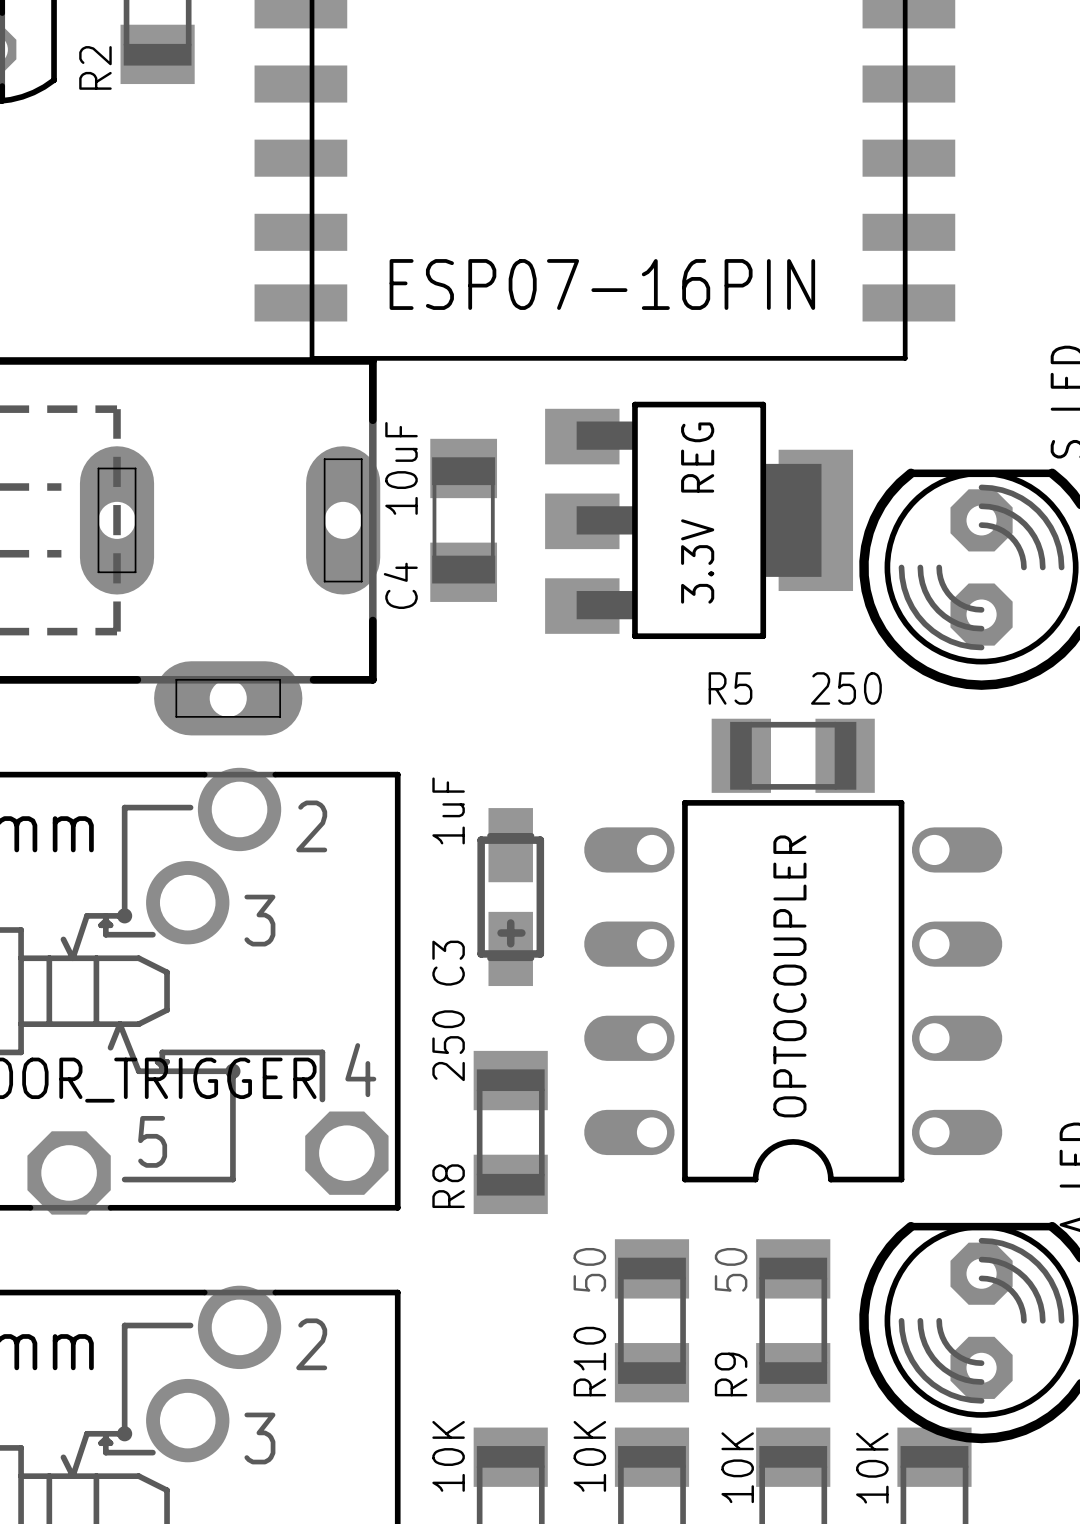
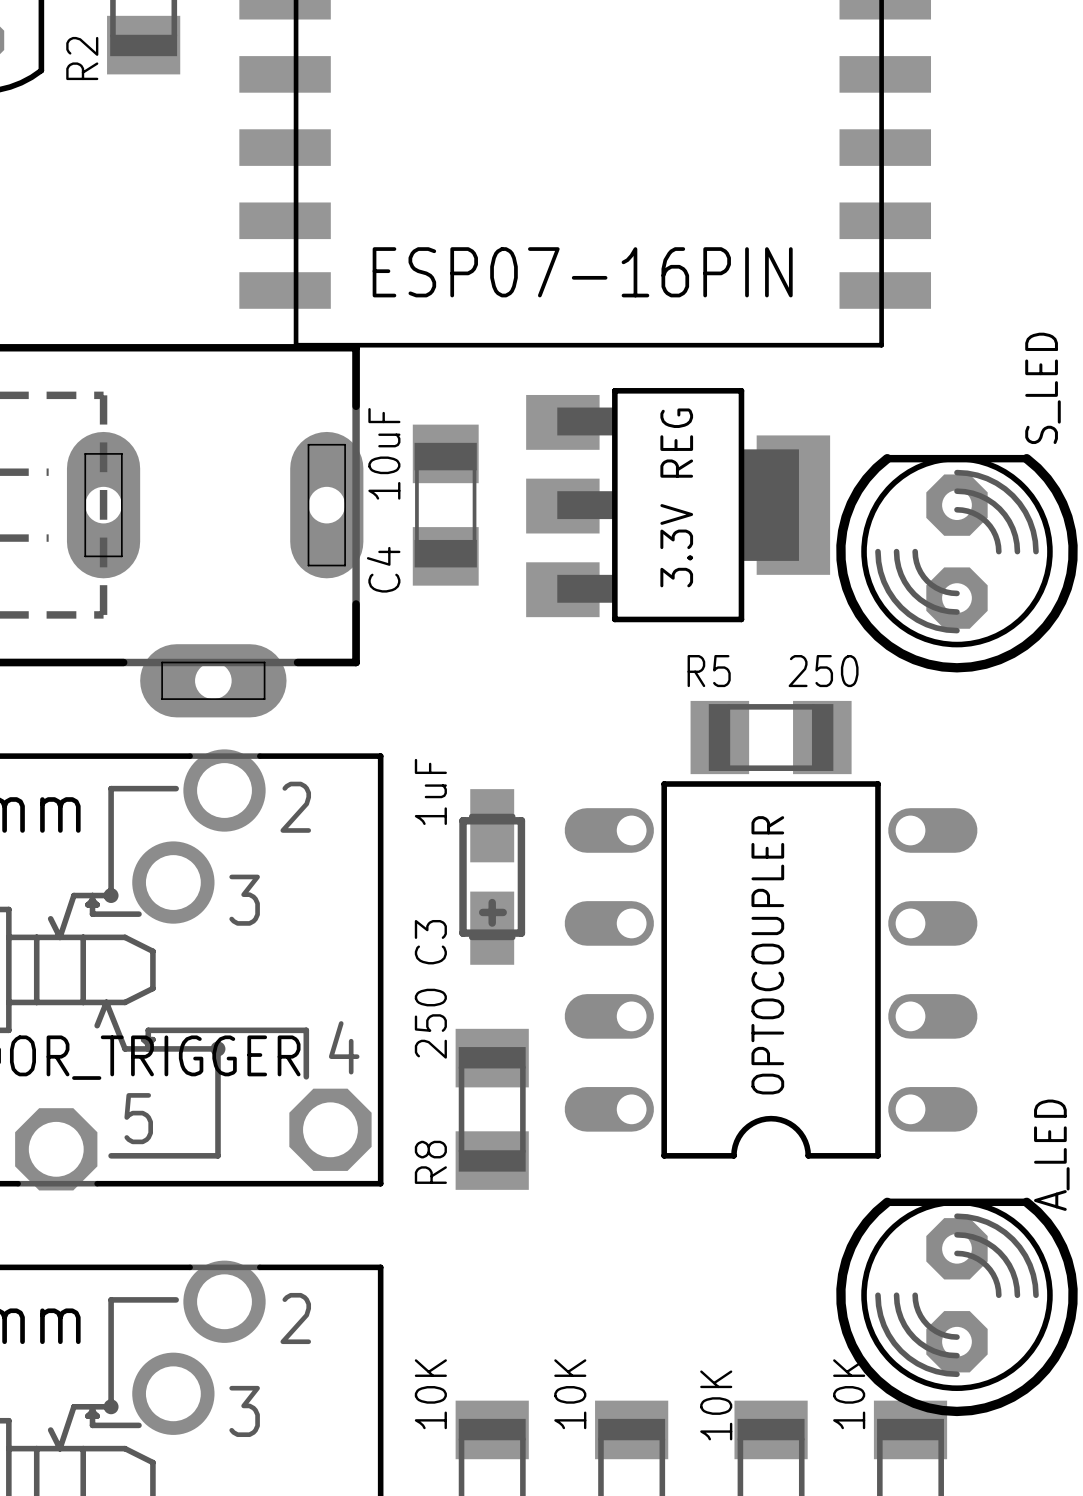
R10: 50 (651, 1320) -> none
R9: 50 (793, 1320) -> none
part value position: 10K (448, 1456) -> 10K (430, 1394)
part value position: 10K (589, 1456) -> 10K (570, 1394)
part value position: 10K (737, 1467) -> 10K (716, 1405)
part value position: 10K (872, 1468) -> 10K (849, 1394)

